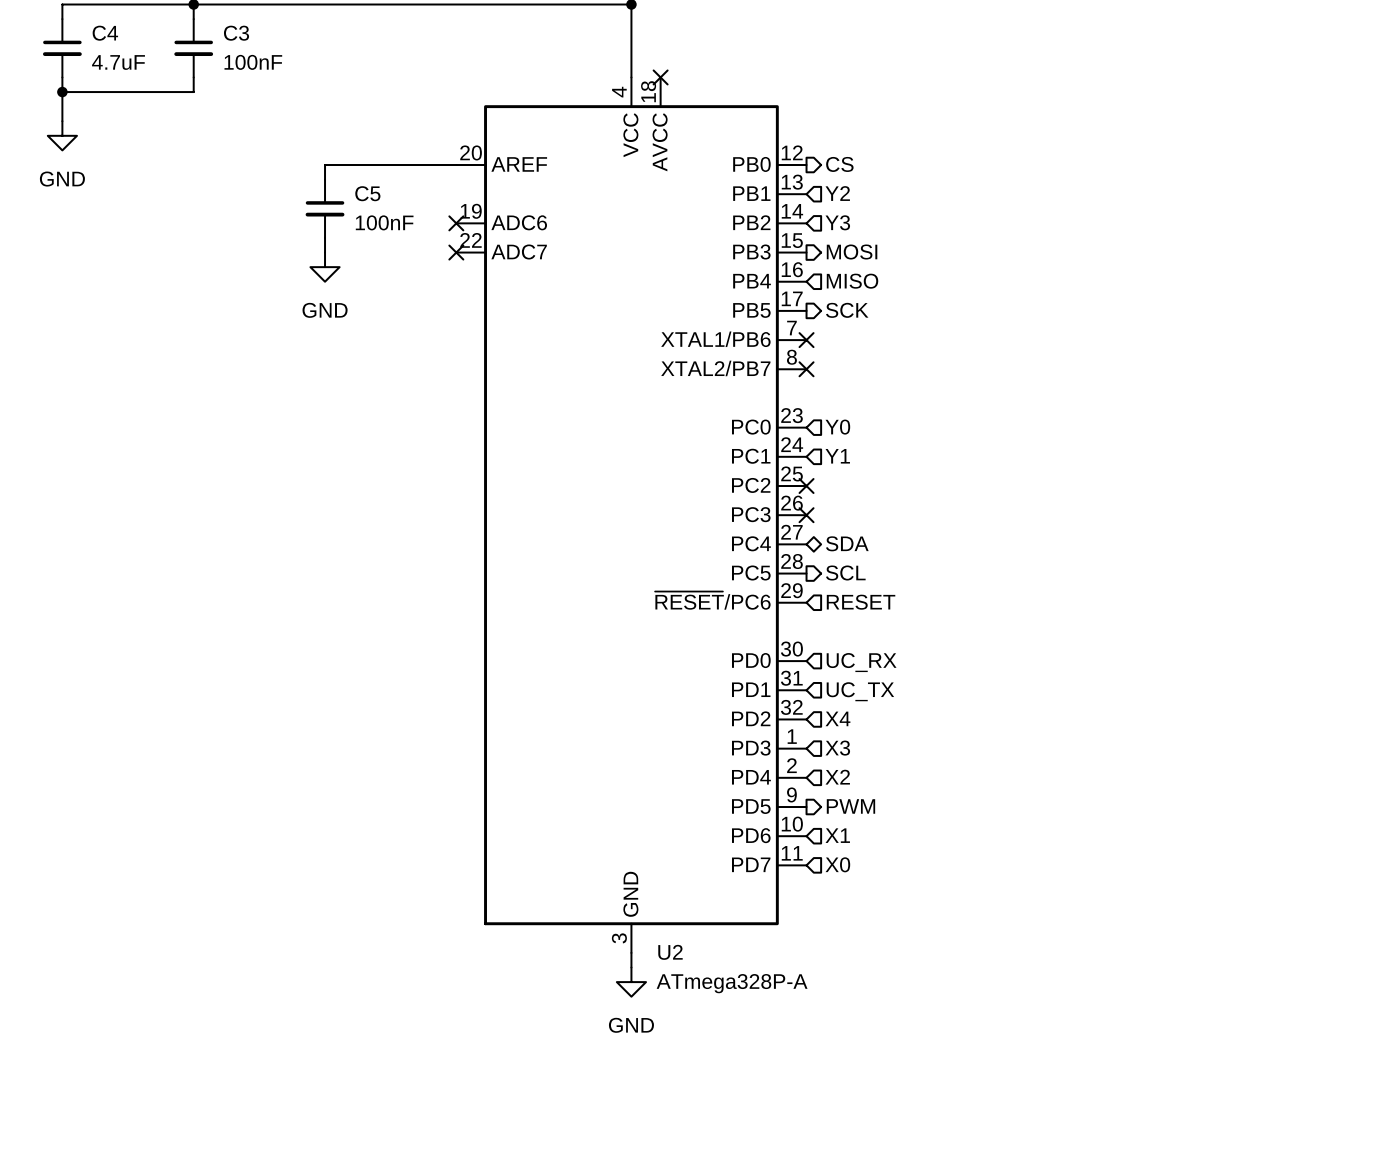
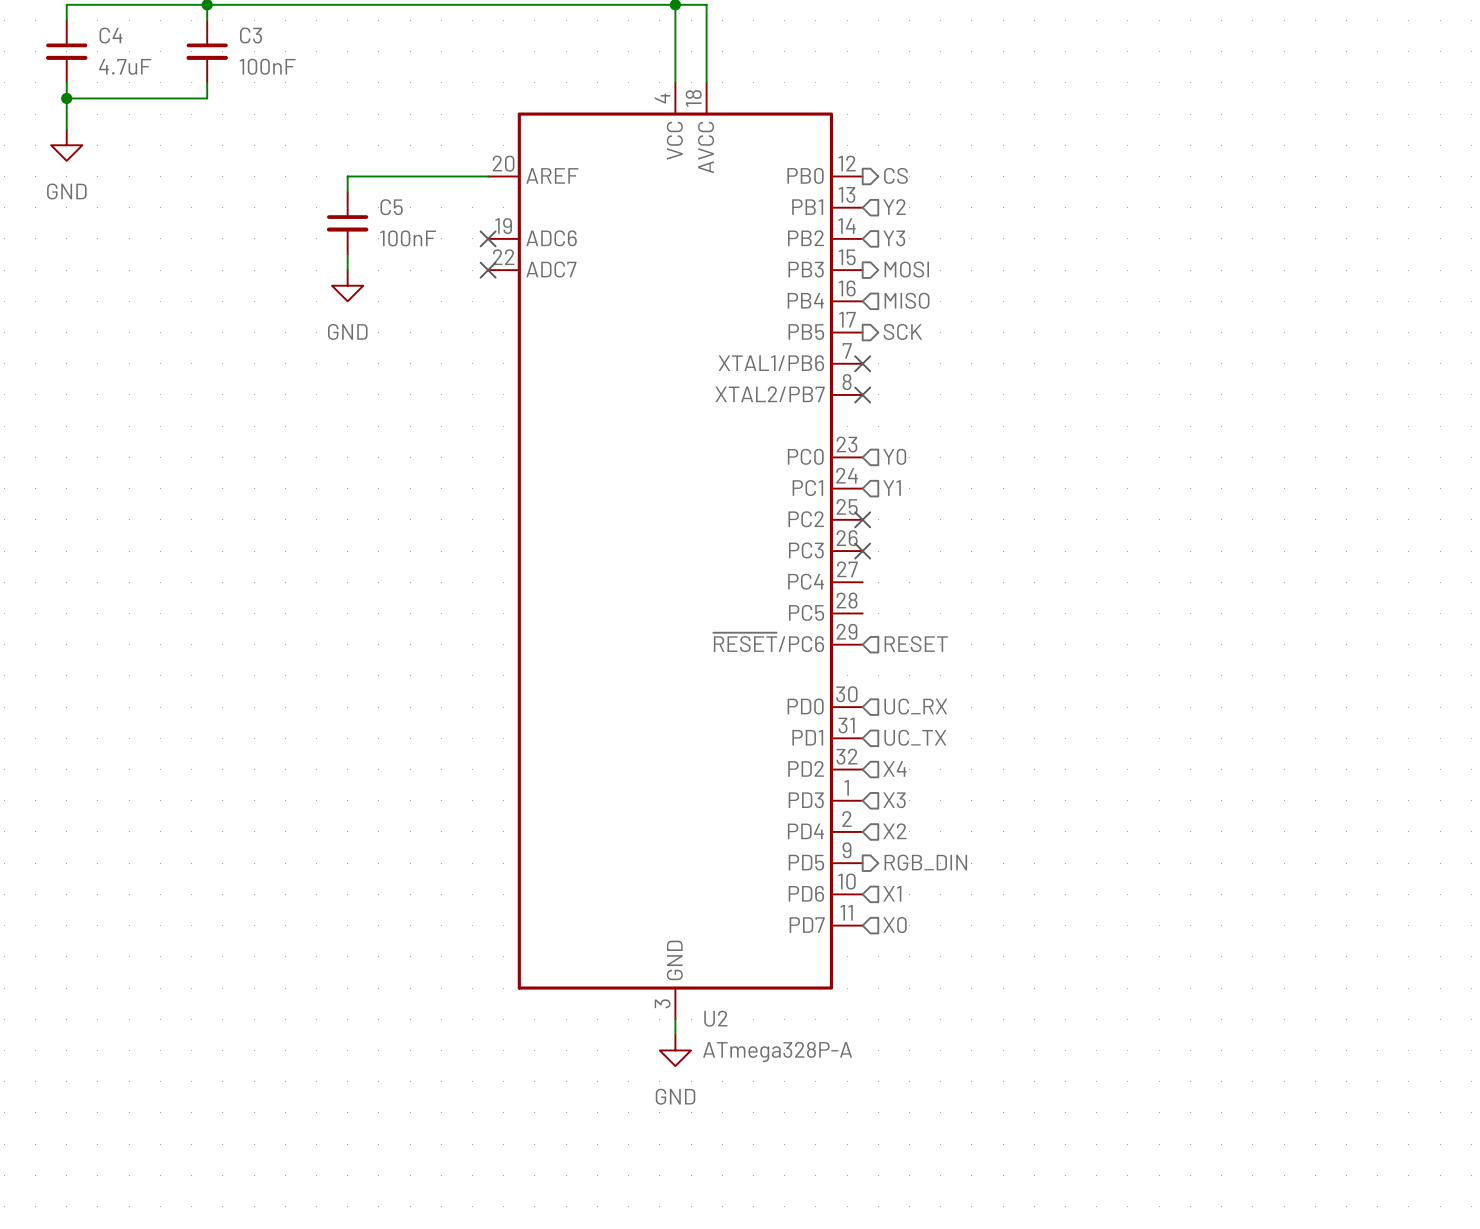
wire: none -> (675, 4) (706, 4) (706, 82)
no-connect mark: (660, 77) -> none
hierarchical label: SDA (847, 543) -> none
hierarchical label: SCL (845, 573) -> none
hierarchical label: PWM (850, 806) -> RGB_DIN (925, 862)

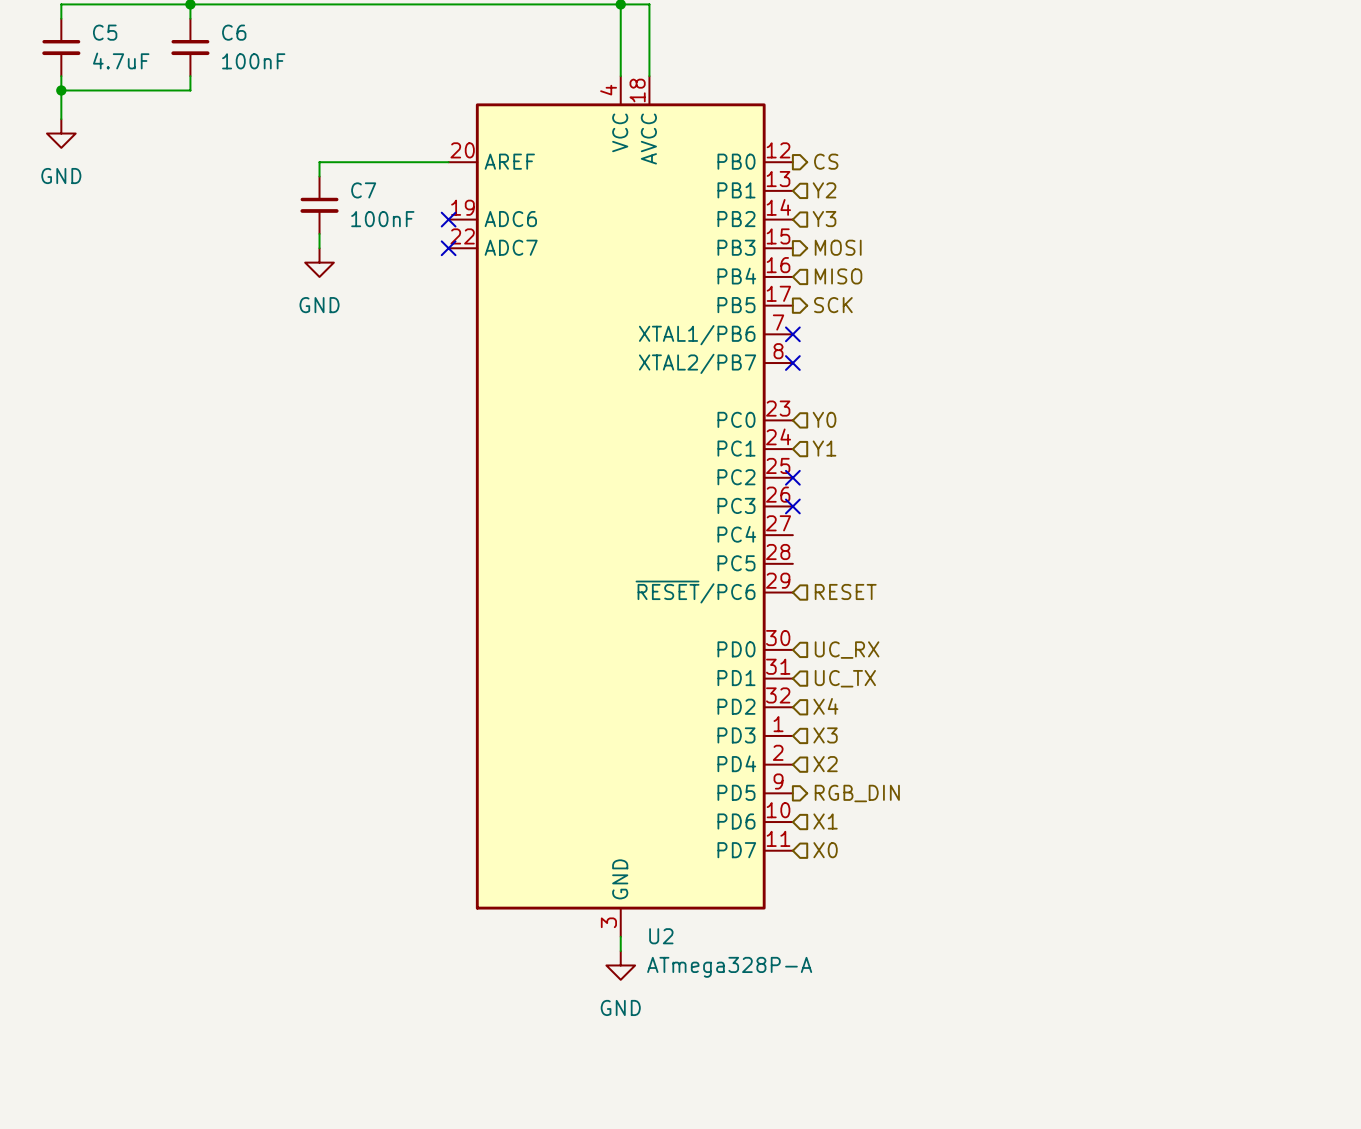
C4 name: C4 (110, 35) -> C5 (105, 32)
C3 name: C3 (250, 35) -> C6 (234, 32)
C5 name: C5 (391, 207) -> C7 (363, 190)

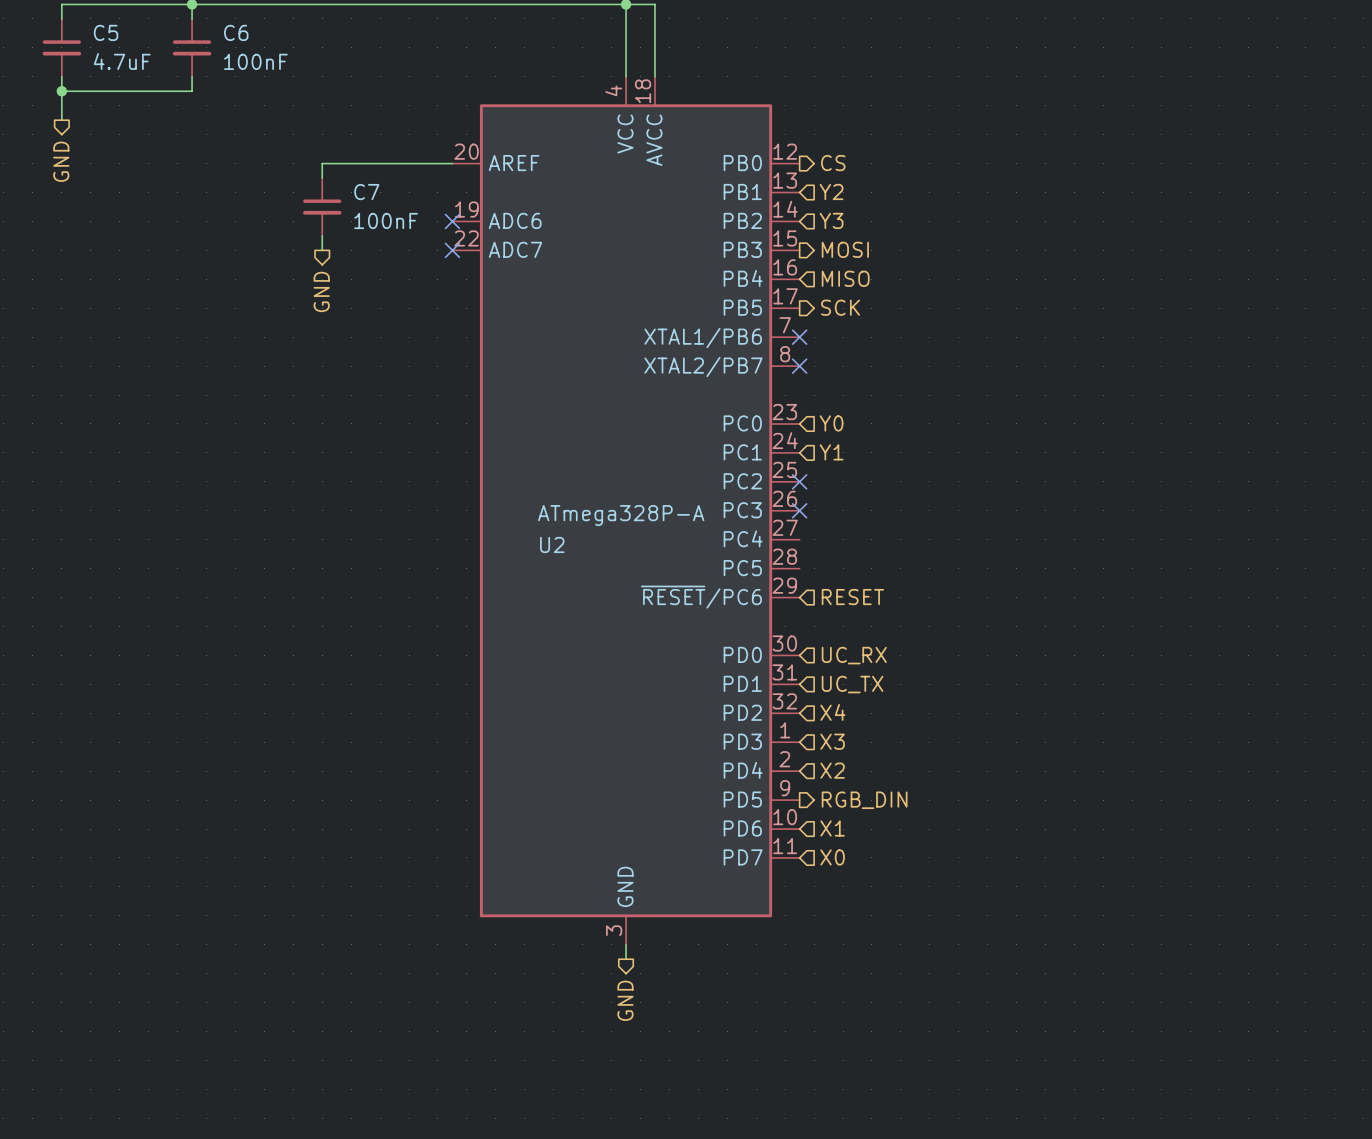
power symbol: GND (61, 133) -> none
hierarchical label: none -> GND (61, 161)
power symbol: GND (319, 262) -> none
hierarchical label: none -> GND (321, 291)
U2 name position: U2 (661, 936) -> U2 (552, 544)
power symbol: GND (620, 965) -> none
U2 value position: ATmega328P-A (729, 967) -> ATmega328P-A (621, 515)
hierarchical label: none -> GND (625, 1000)

